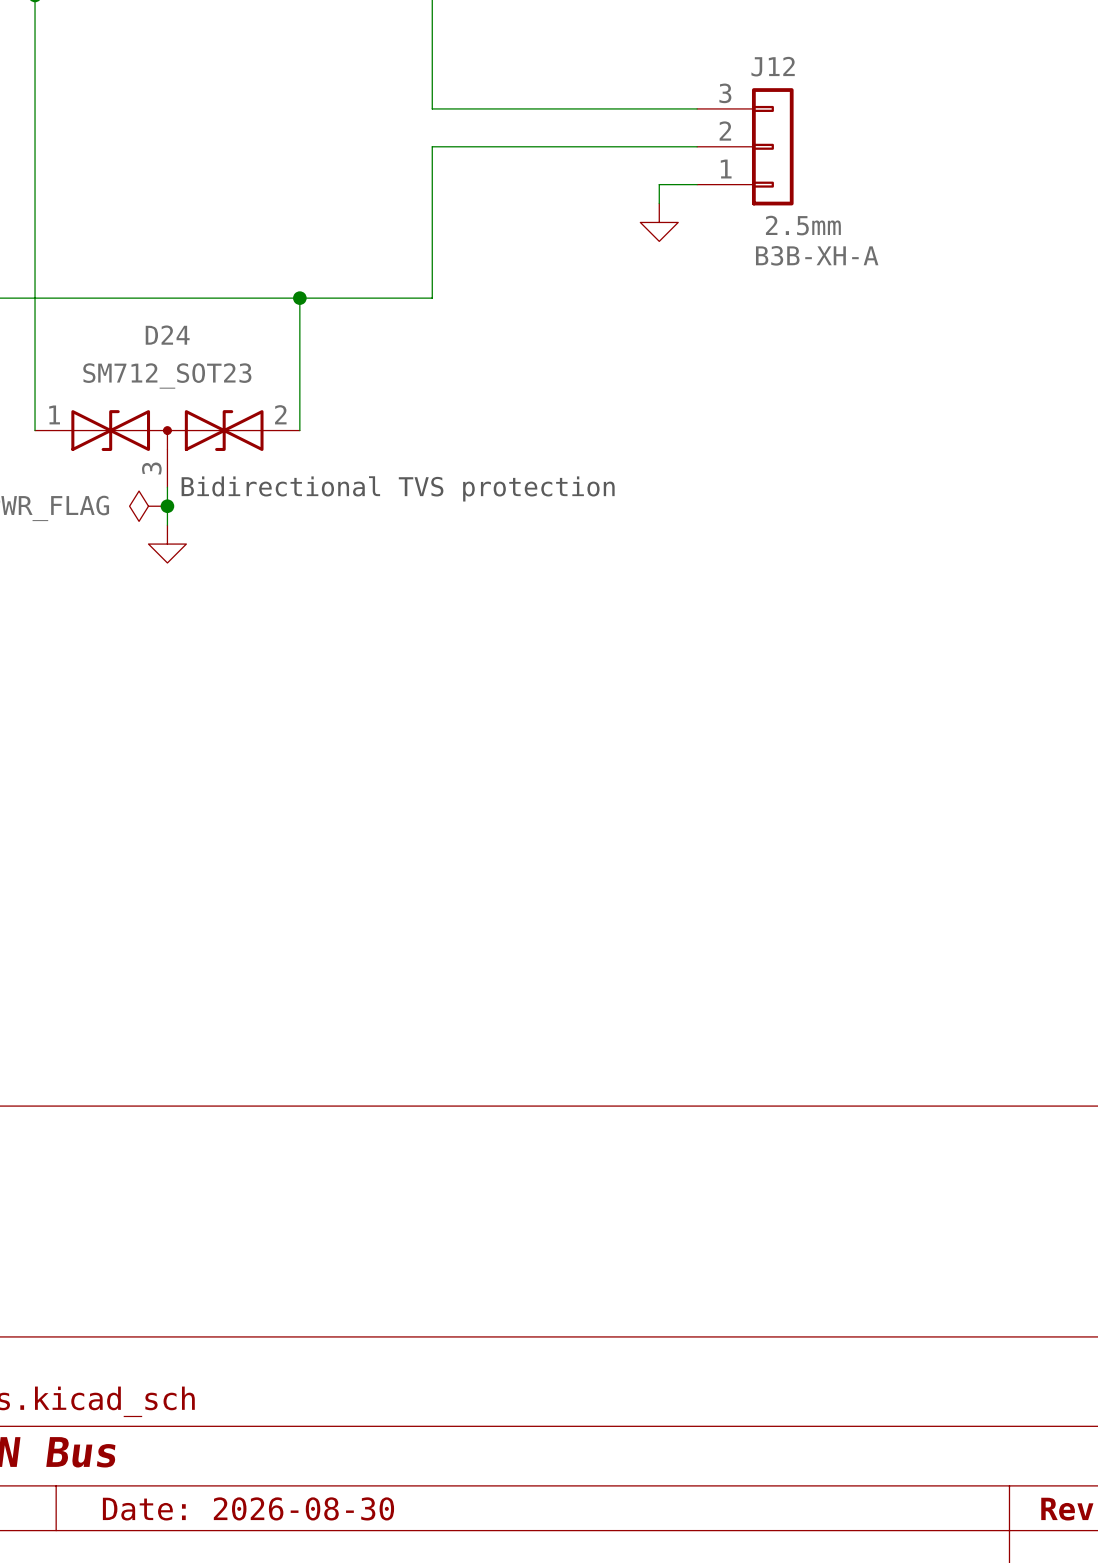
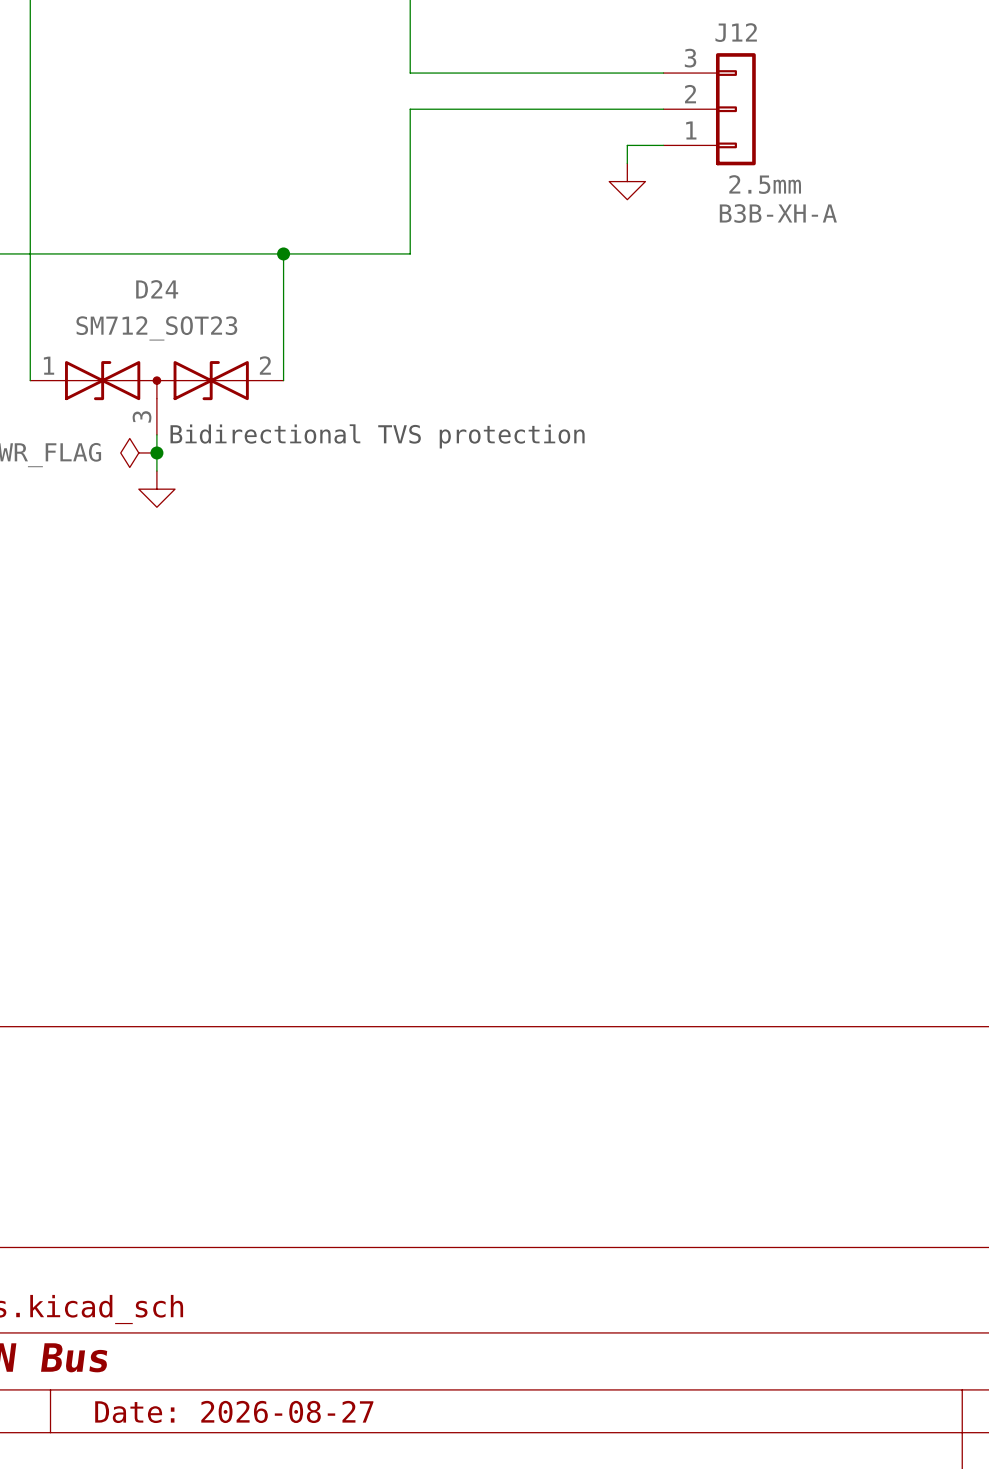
title block: Date: 2026-08-30 (248, 1508) -> Date: 2026-08-27 (234, 1411)

